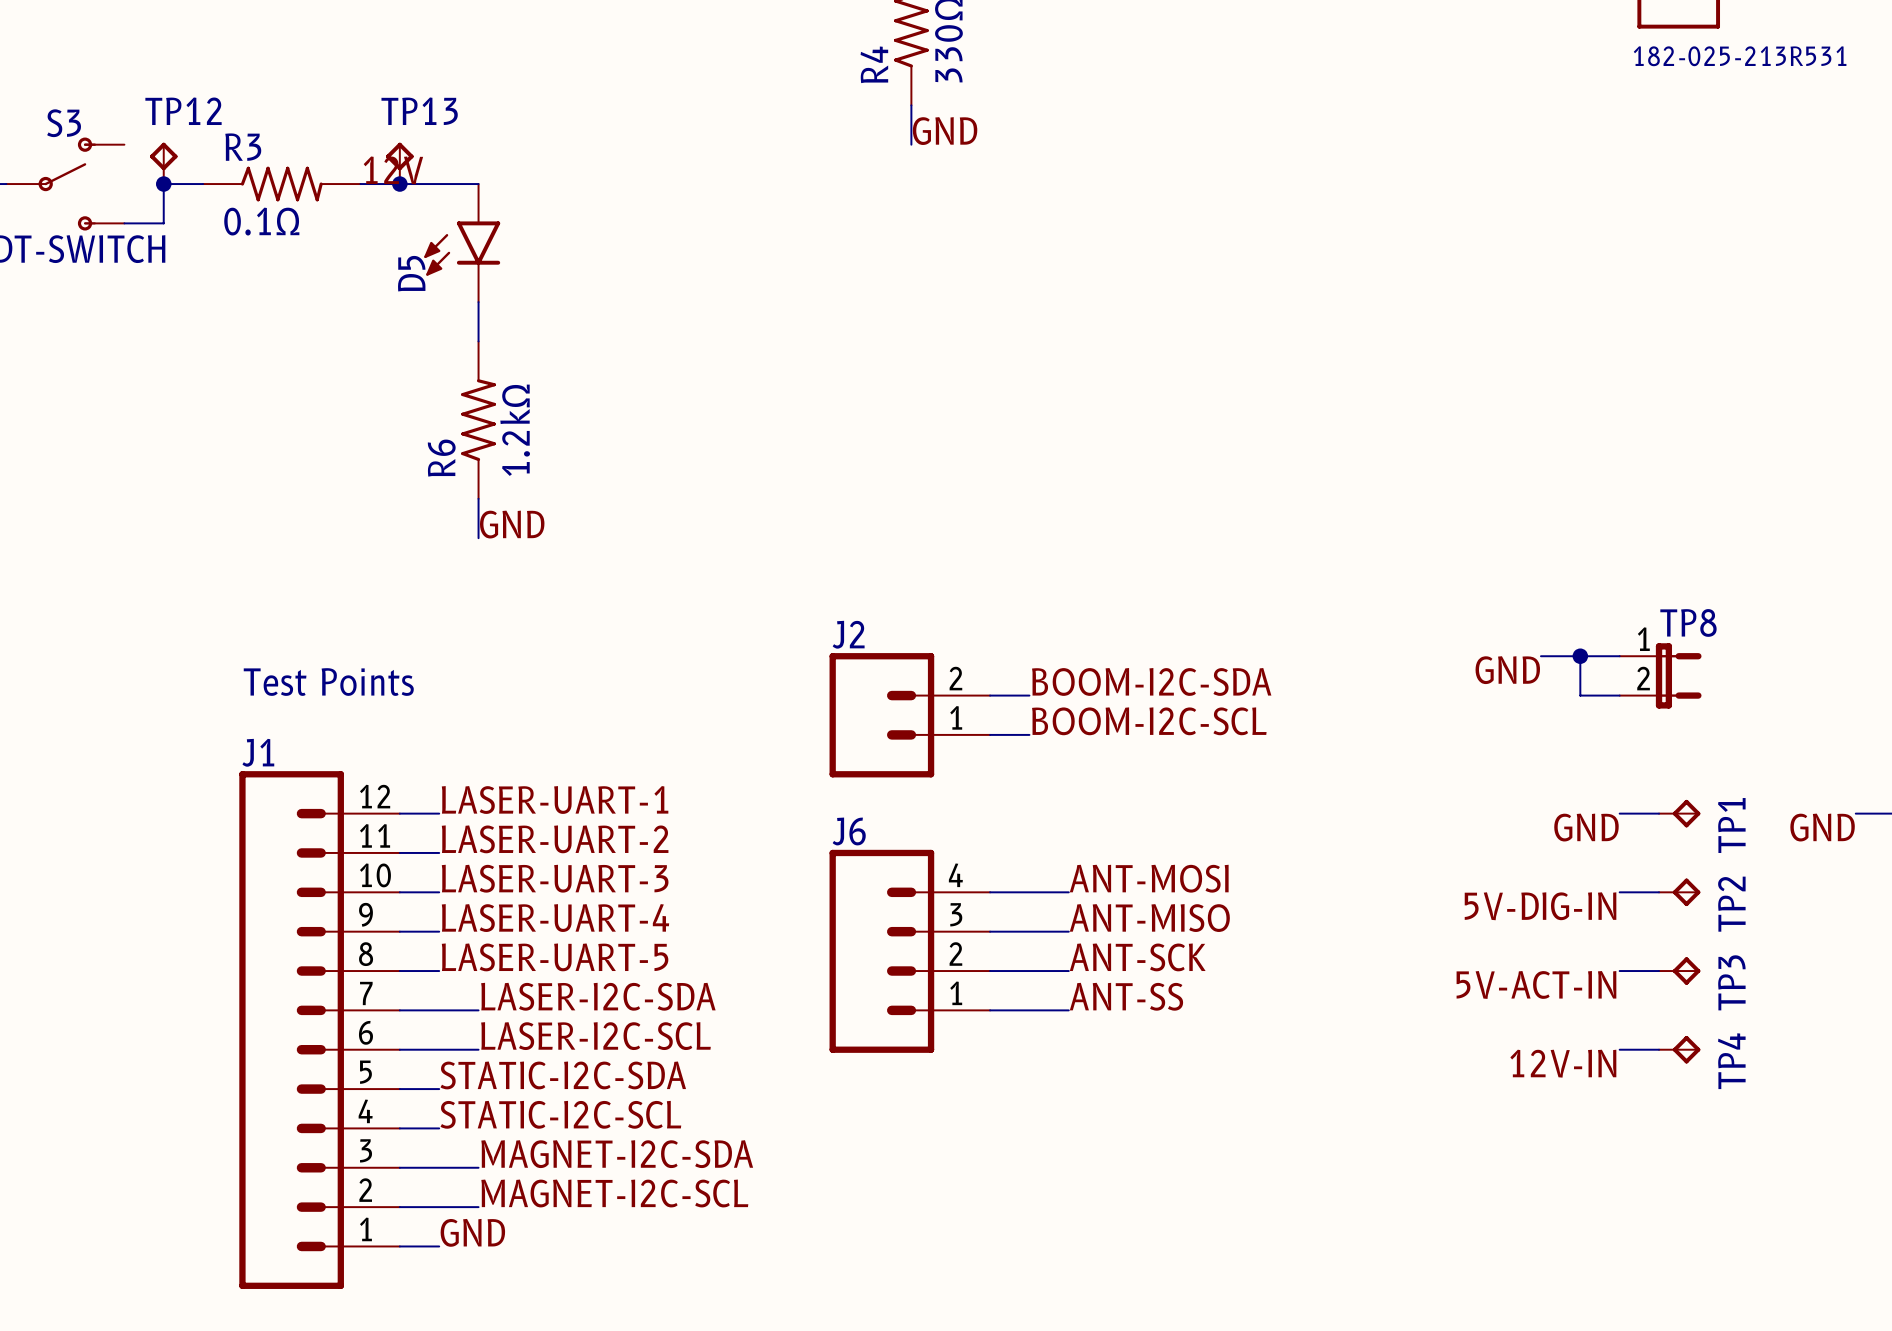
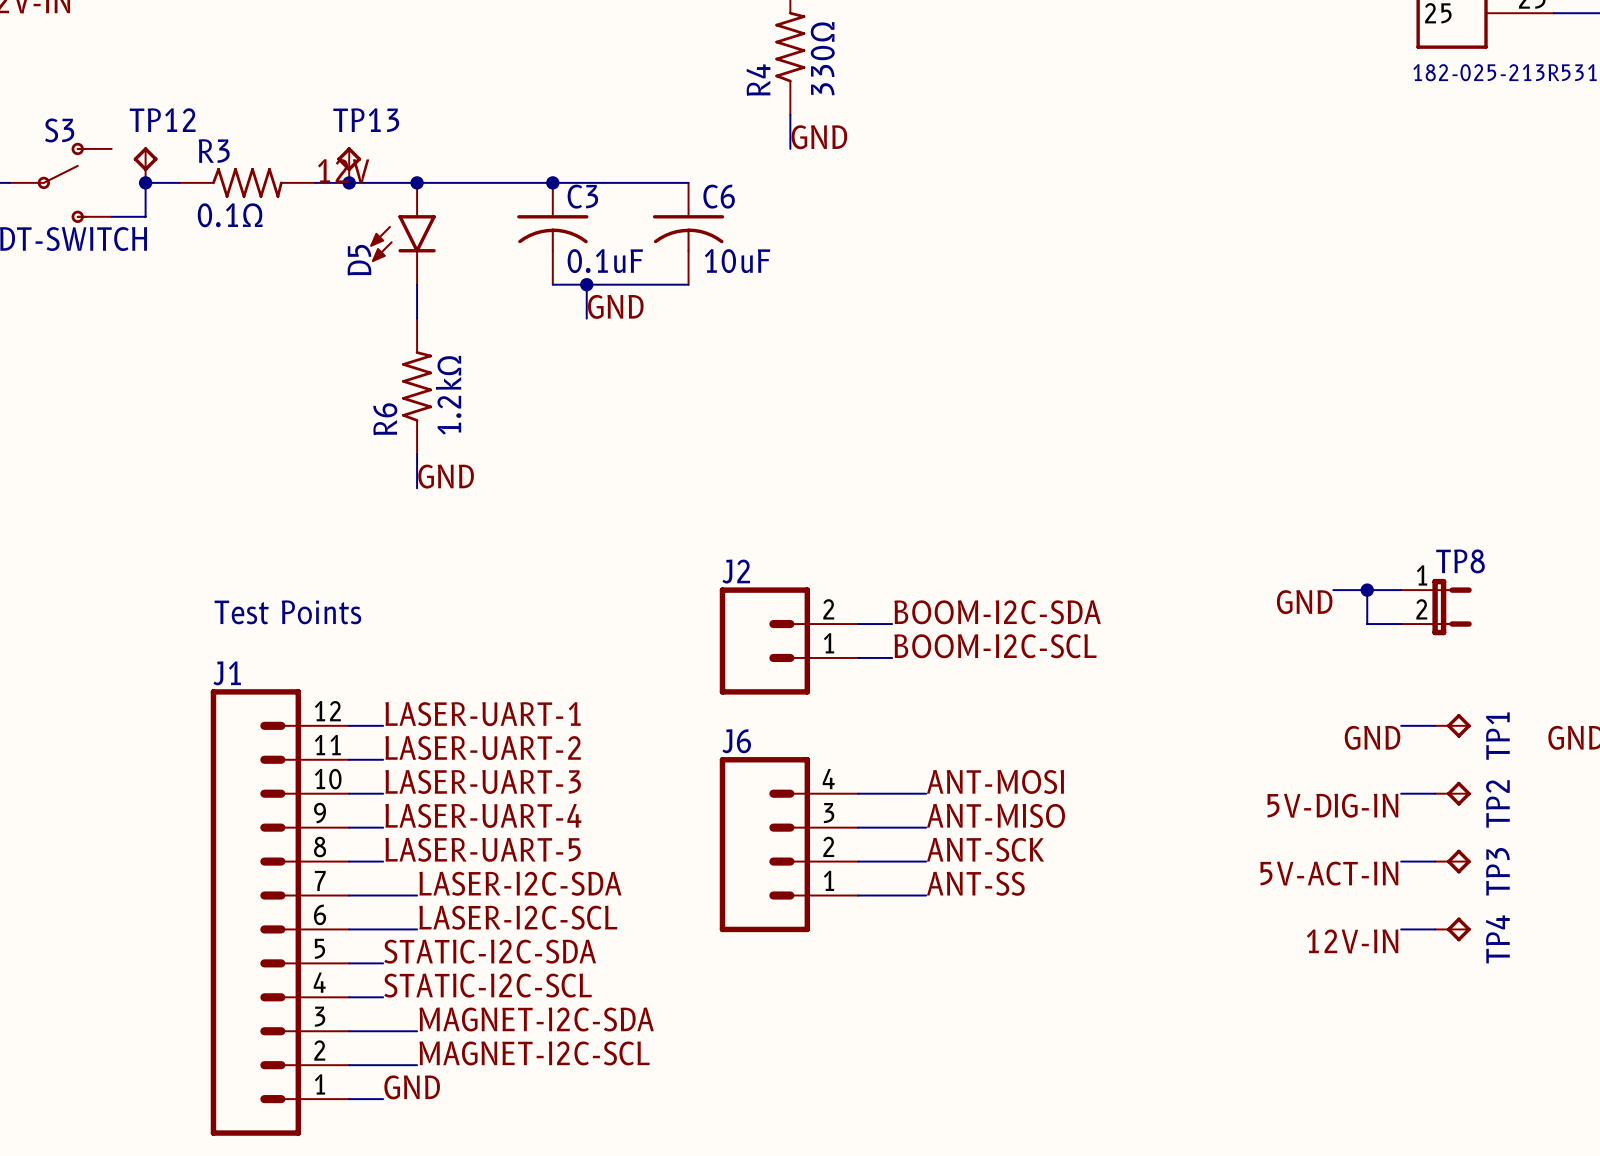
wire: none -> (417, 182) (688, 182)
junction: none -> (417, 182)
junction: none -> (552, 182)
C3: none -> 0.1uF (552, 233)
C6: none -> 10uF (688, 233)
wire: none -> (552, 284) (688, 284)
wire: none -> (586, 284) (586, 318)
junction: none -> (586, 284)
label: none -> GND (615, 306)

